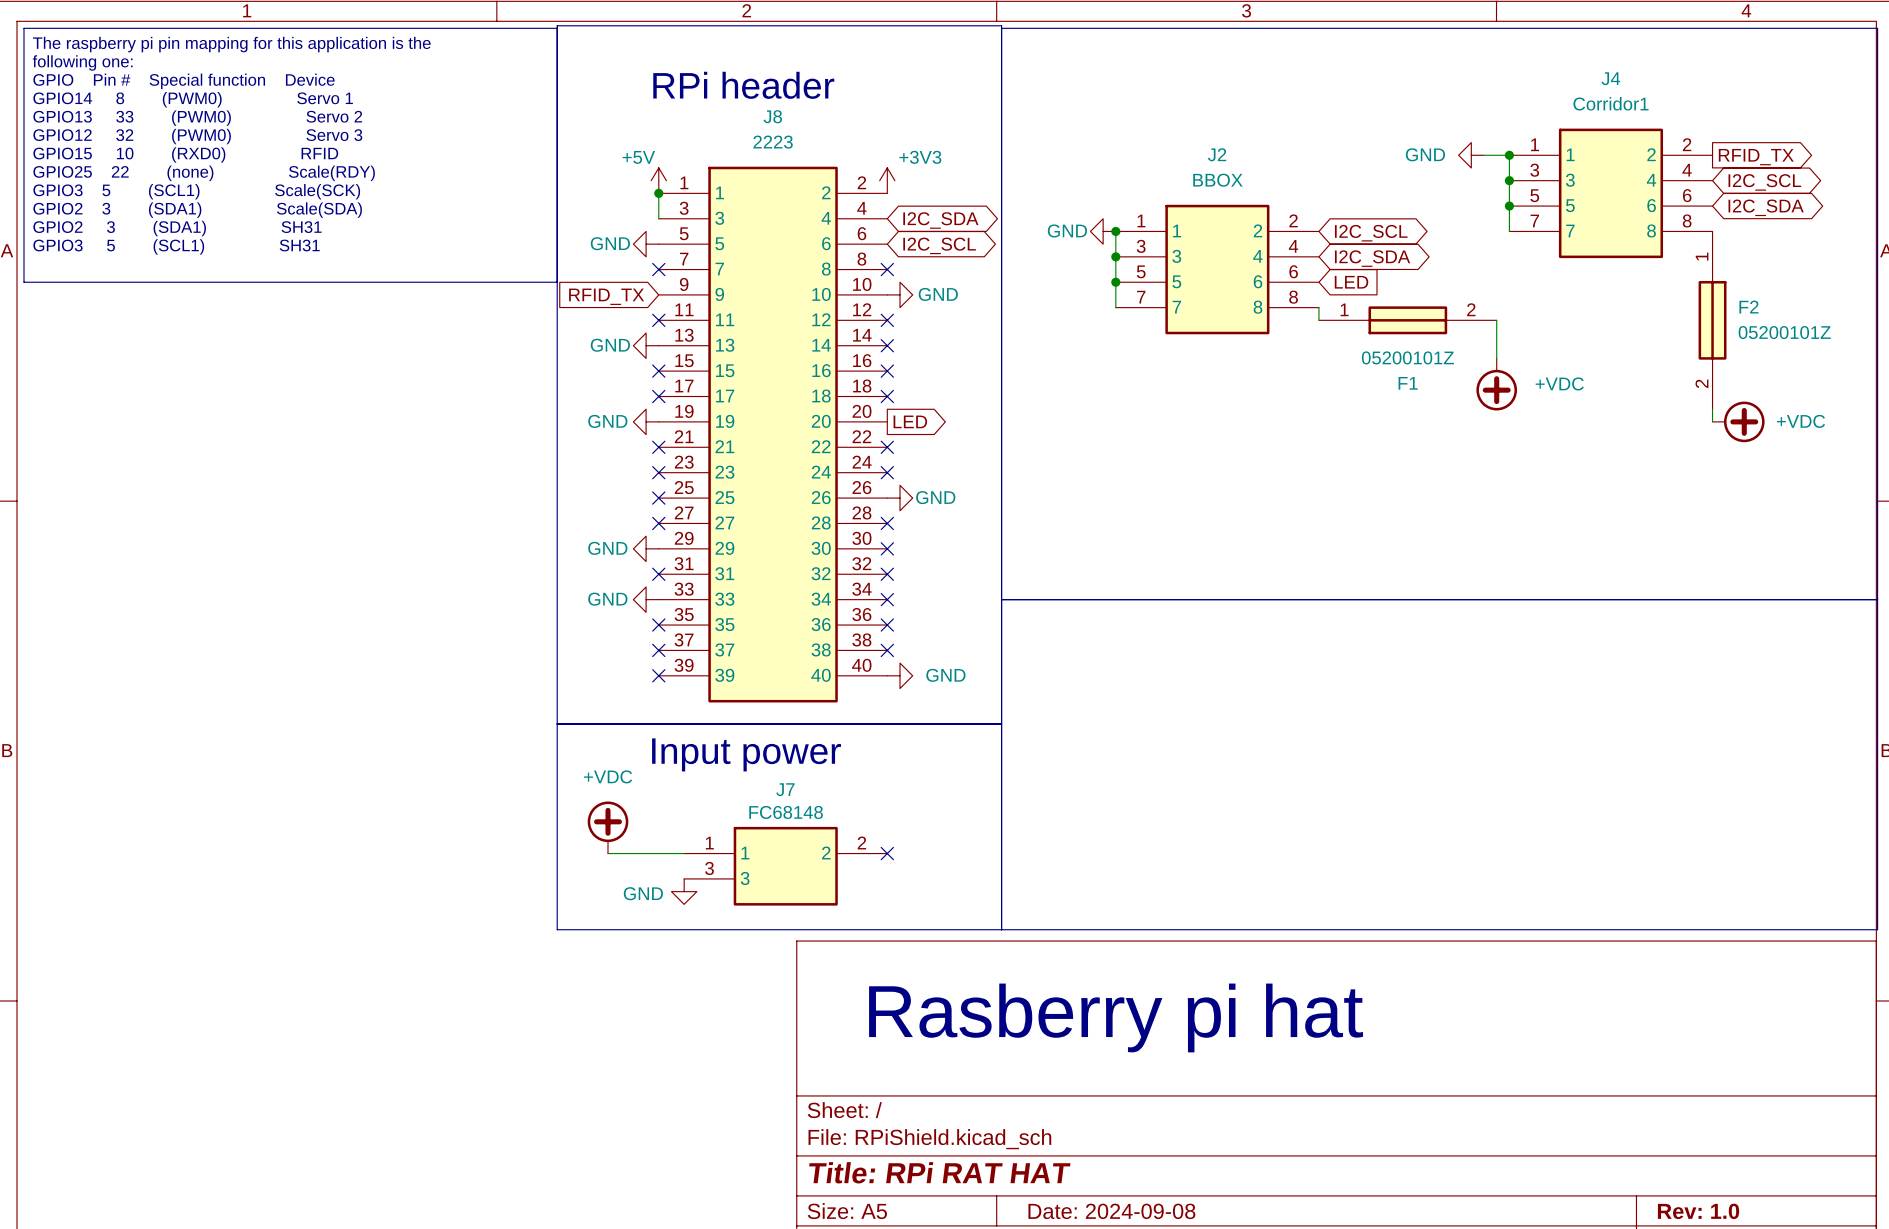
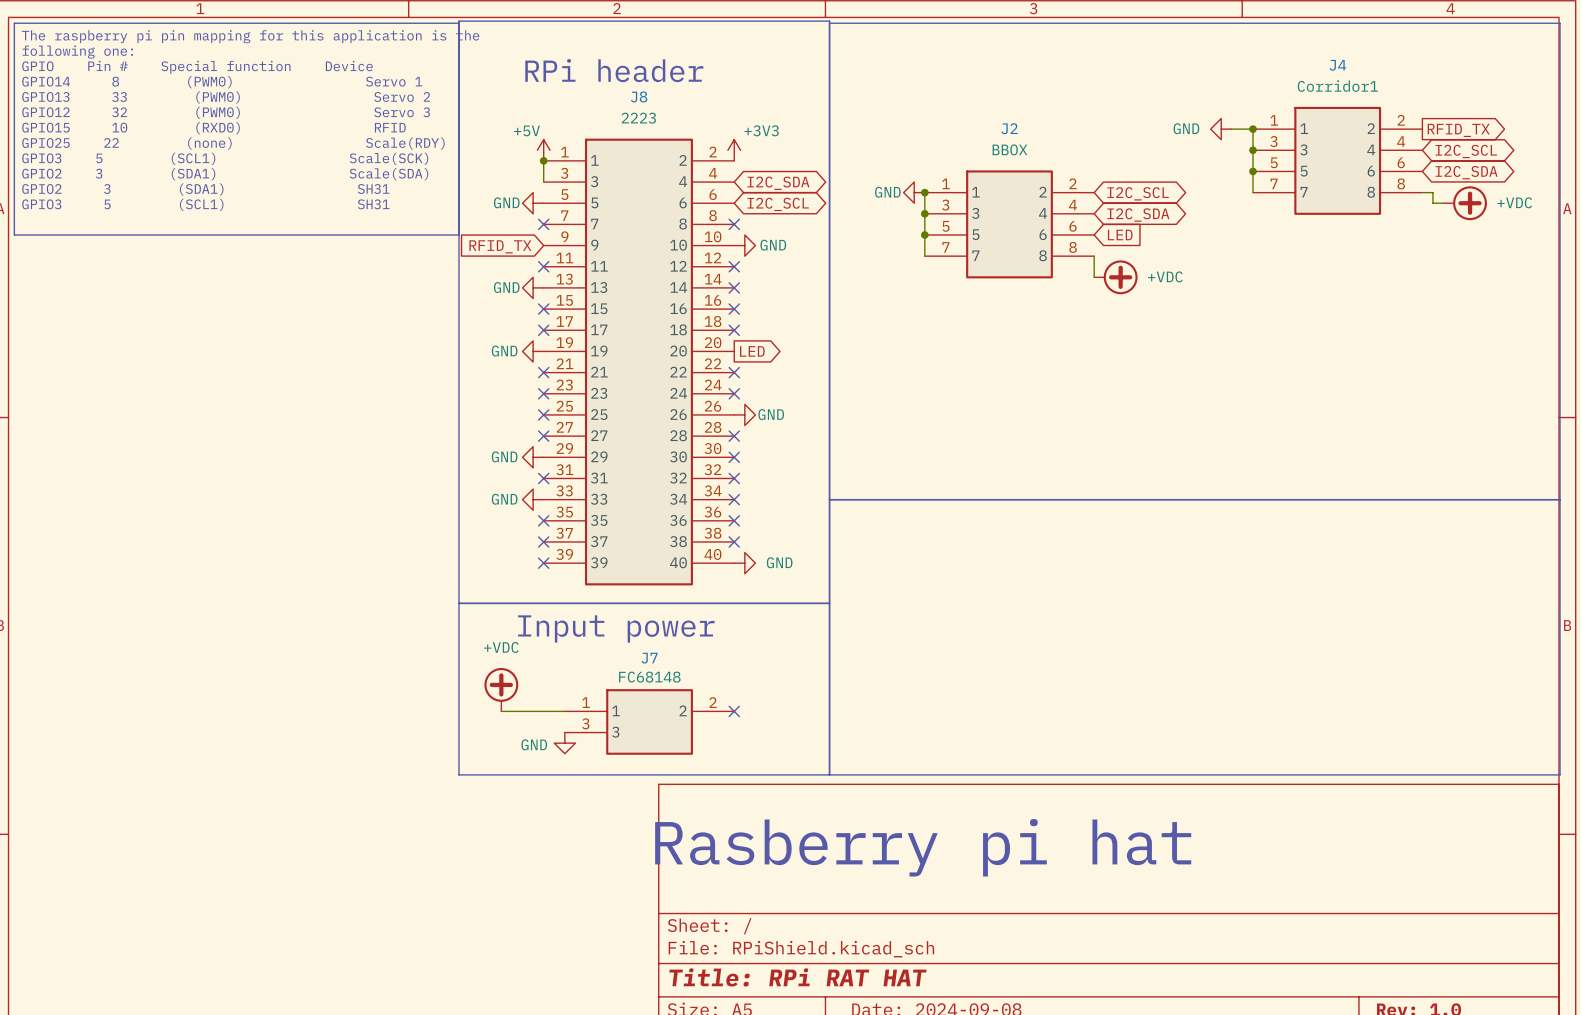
wire: none -> (1422, 192) (1432, 192) (1432, 203) (1443, 203)
power symbol: none -> +VDC (1465, 203)
wire: none -> (1094, 266) (1094, 277)
F1: 05200101Z (1407, 320) -> none
wire: (1496, 320) (1496, 358) -> none
F2: 05200101Z (1712, 320) -> none
power symbol: none -> +VDC (1115, 277)
power symbol: +VDC (1496, 384) -> none
wire: (1712, 409) (1712, 421) -> none
power symbol: +VDC (1738, 421) -> none

